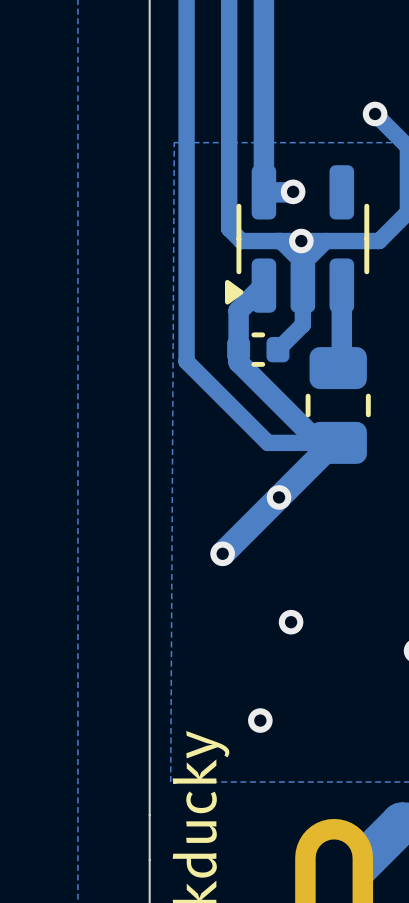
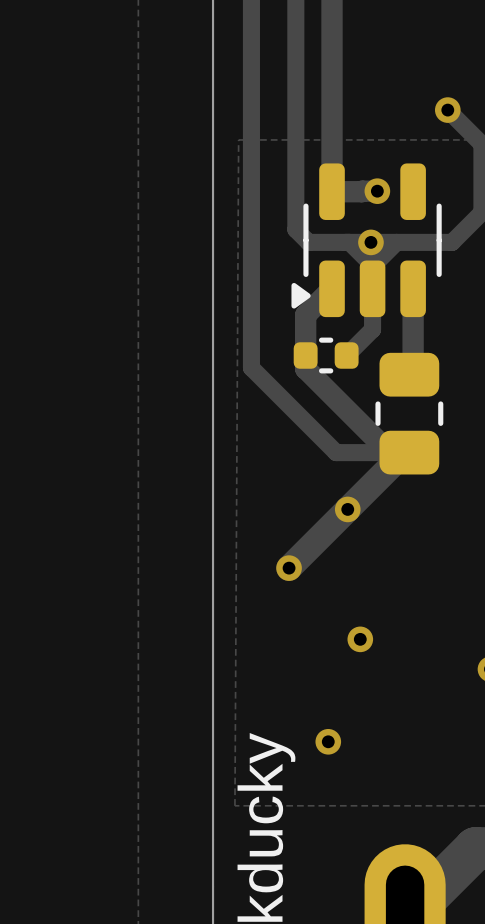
via position: (293, 191) -> (377, 191)

